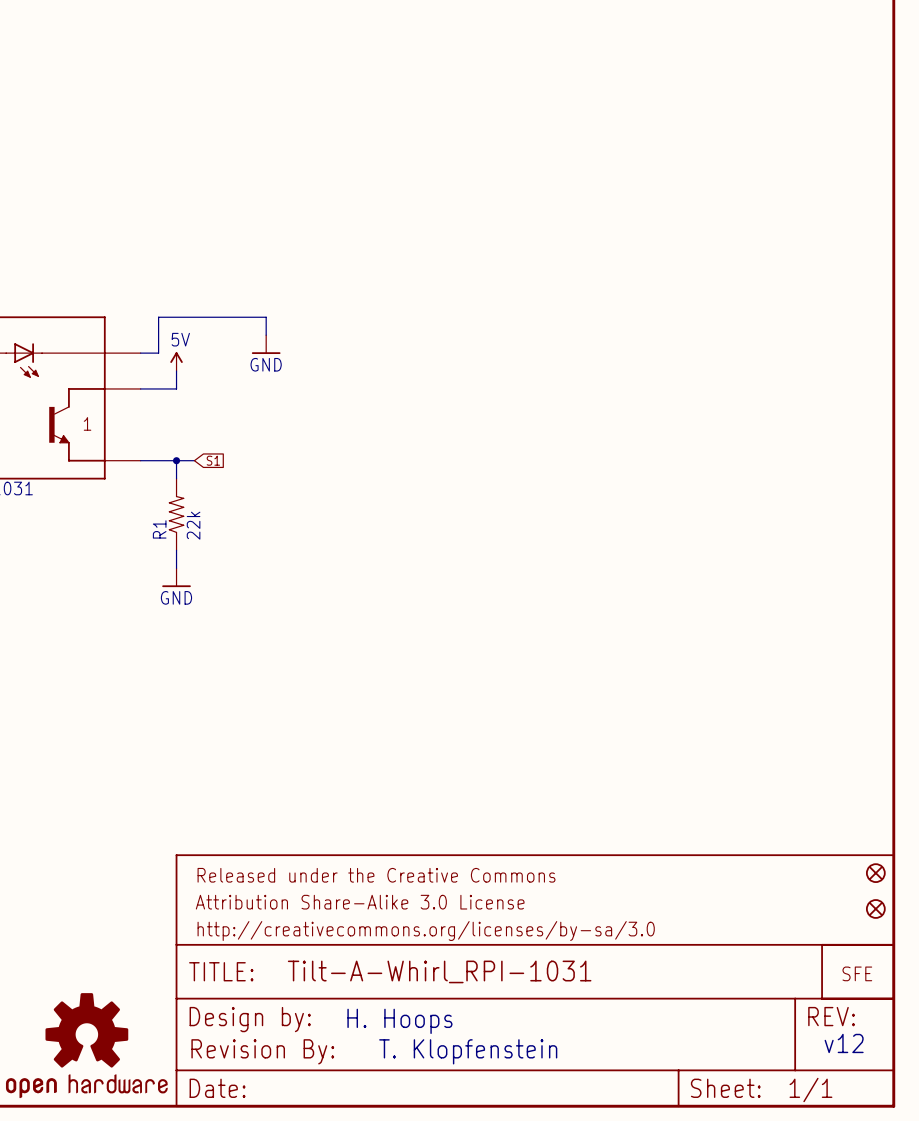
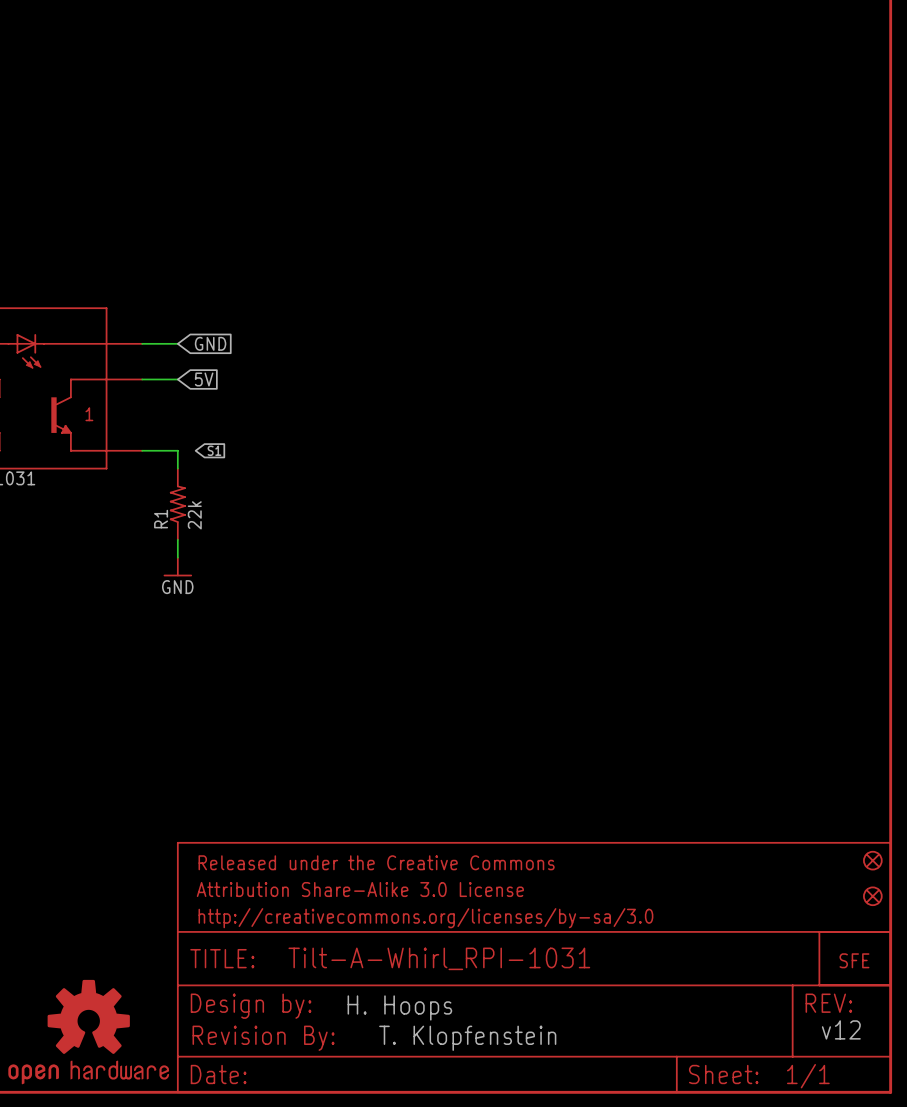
wire: (266, 335) (266, 317) (158, 317) (158, 353) -> (177, 343) (160, 343)
power symbol: GND (266, 344) -> none
global label: none -> GND (210, 343)
power symbol: 5V (176, 361) -> none
wire: (176, 371) (176, 388) -> none
global label: none -> 5V (204, 379)
wire: (176, 460) (194, 460) -> none
junction: (176, 460) -> none

